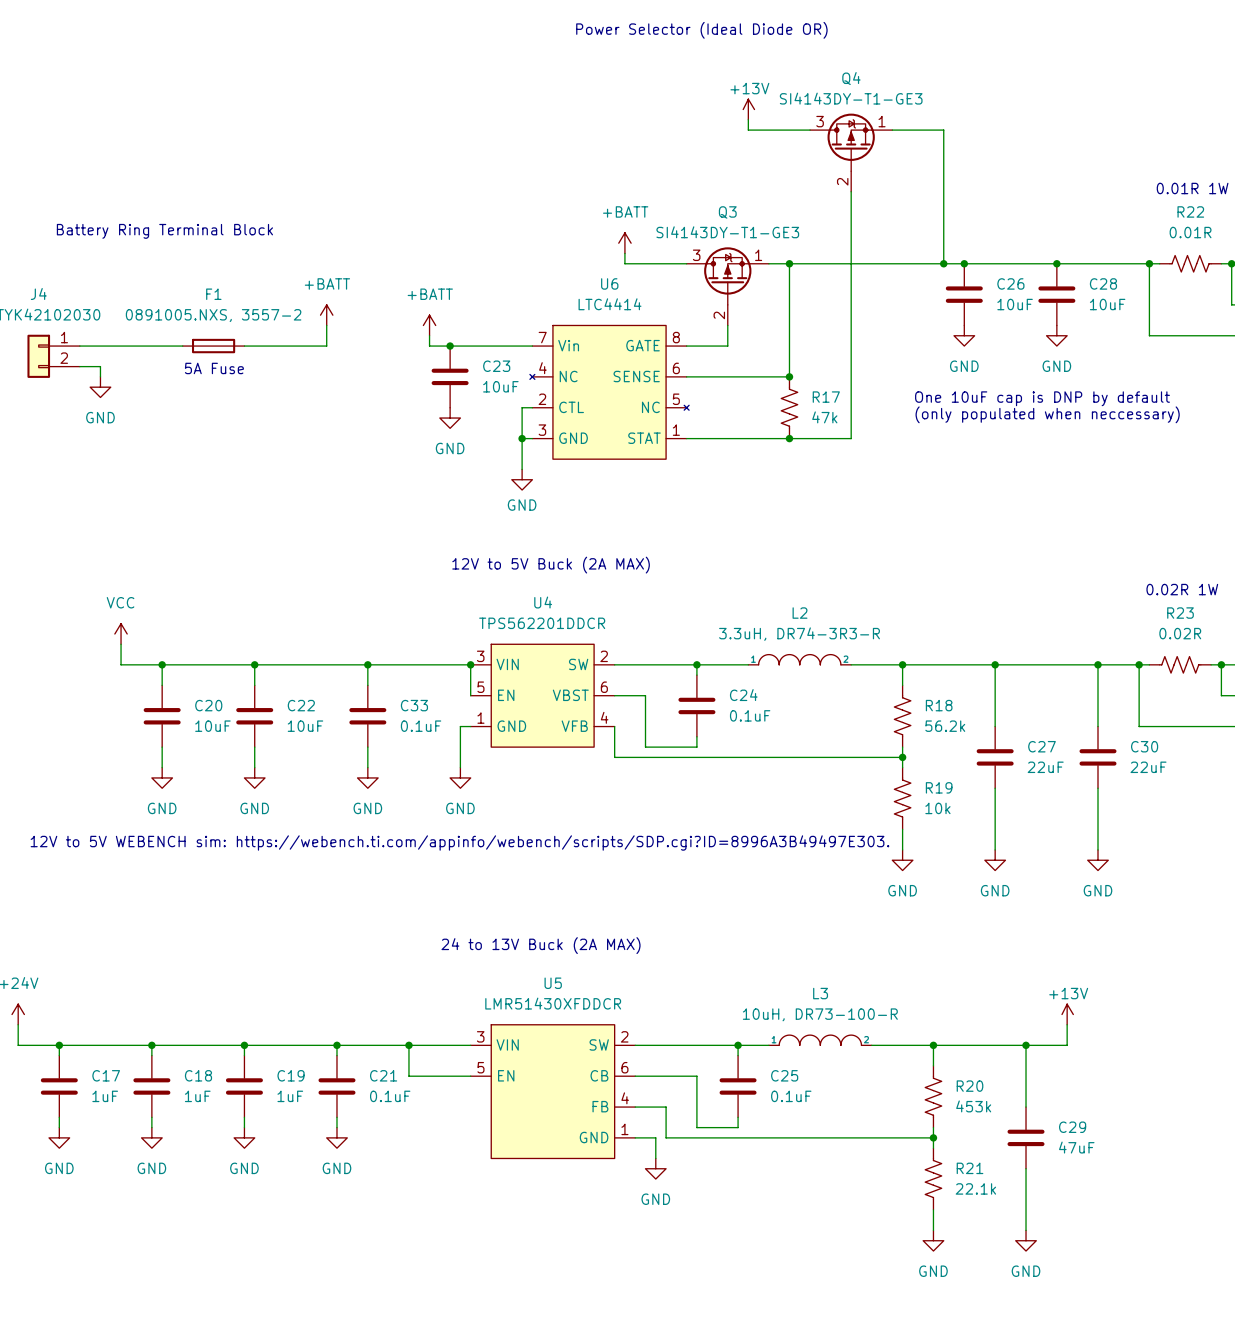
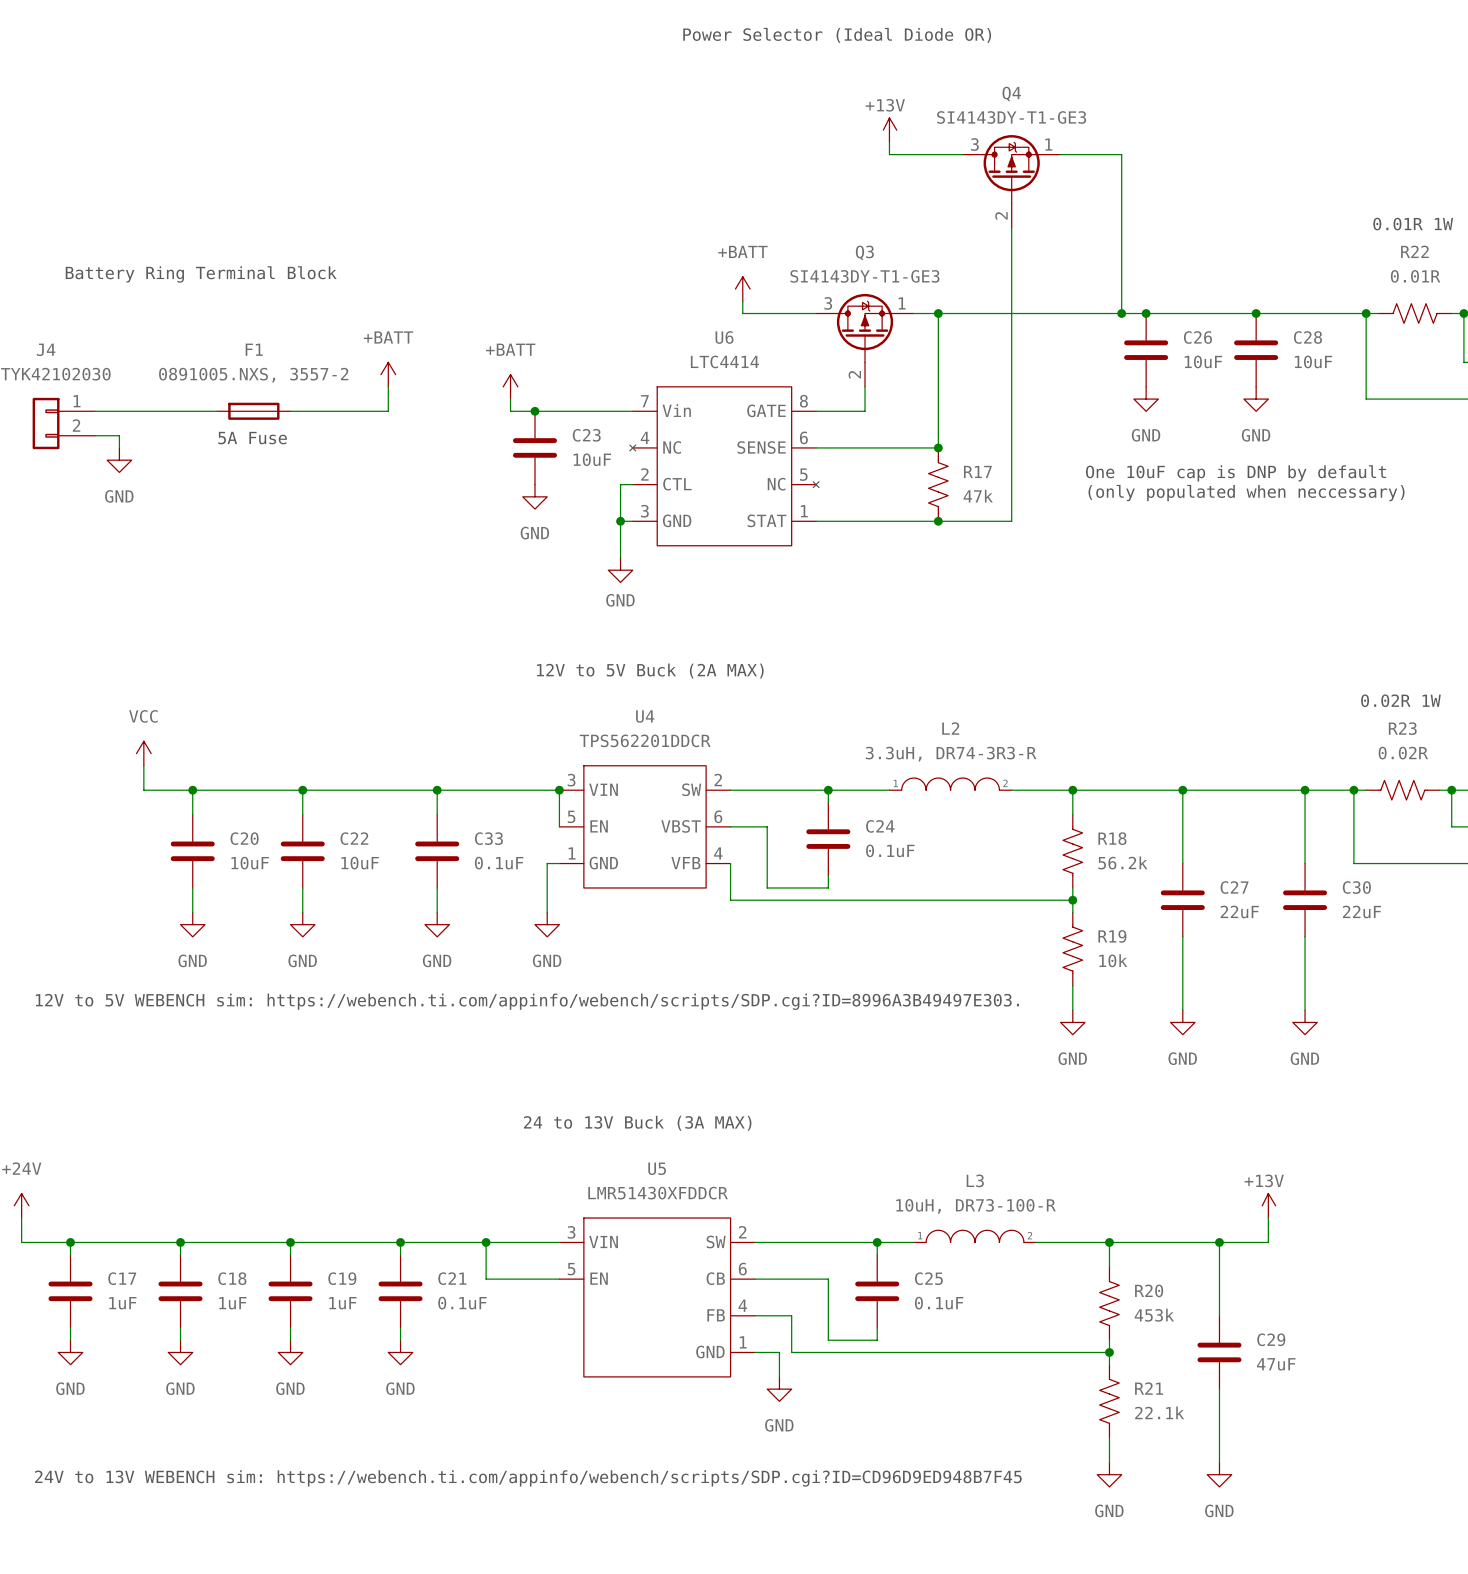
text: 24 to 13V Buck (2A MAX) (541, 945) -> 24 to 13V Buck (3A MAX) (637, 1123)
text: none -> 24V to 13V WEBENCH sim: https://webench.ti.com/appinfo/webench/scripts/SDP.cgi?ID=CD96D9ED948B7F45 (528, 1478)

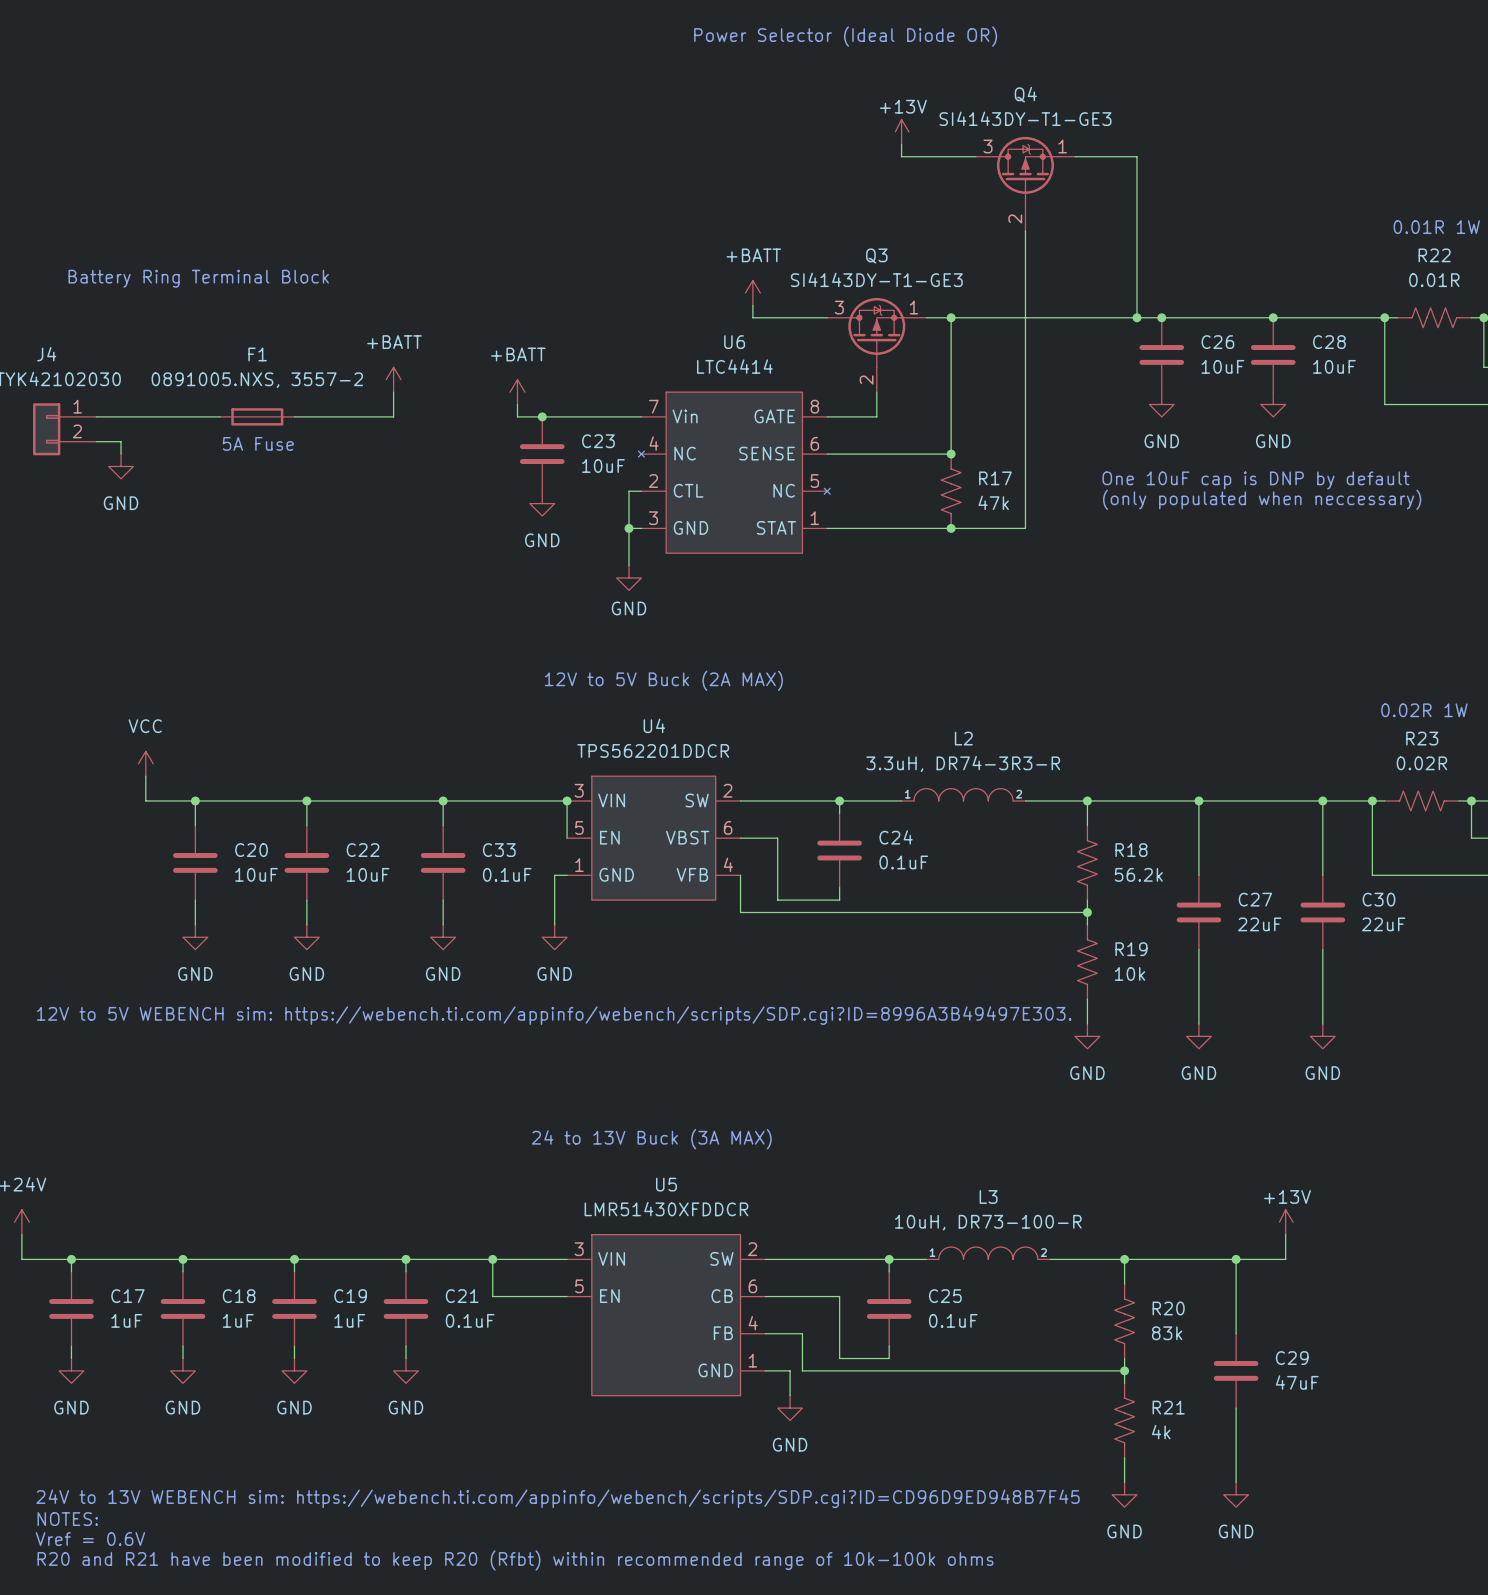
R20 value: 453k (1154, 1315) -> 83k (1167, 1333)
R21 value: 22.1k (1159, 1412) -> 4k (1161, 1432)
text: none -> NOTES: (67, 1519)
text: none -> Vref = 0.6V (90, 1539)
text: none -> R20 and R21 have been modified to keep R20 (Rfbt) within recommended range of 10k-100k ohms (515, 1560)

